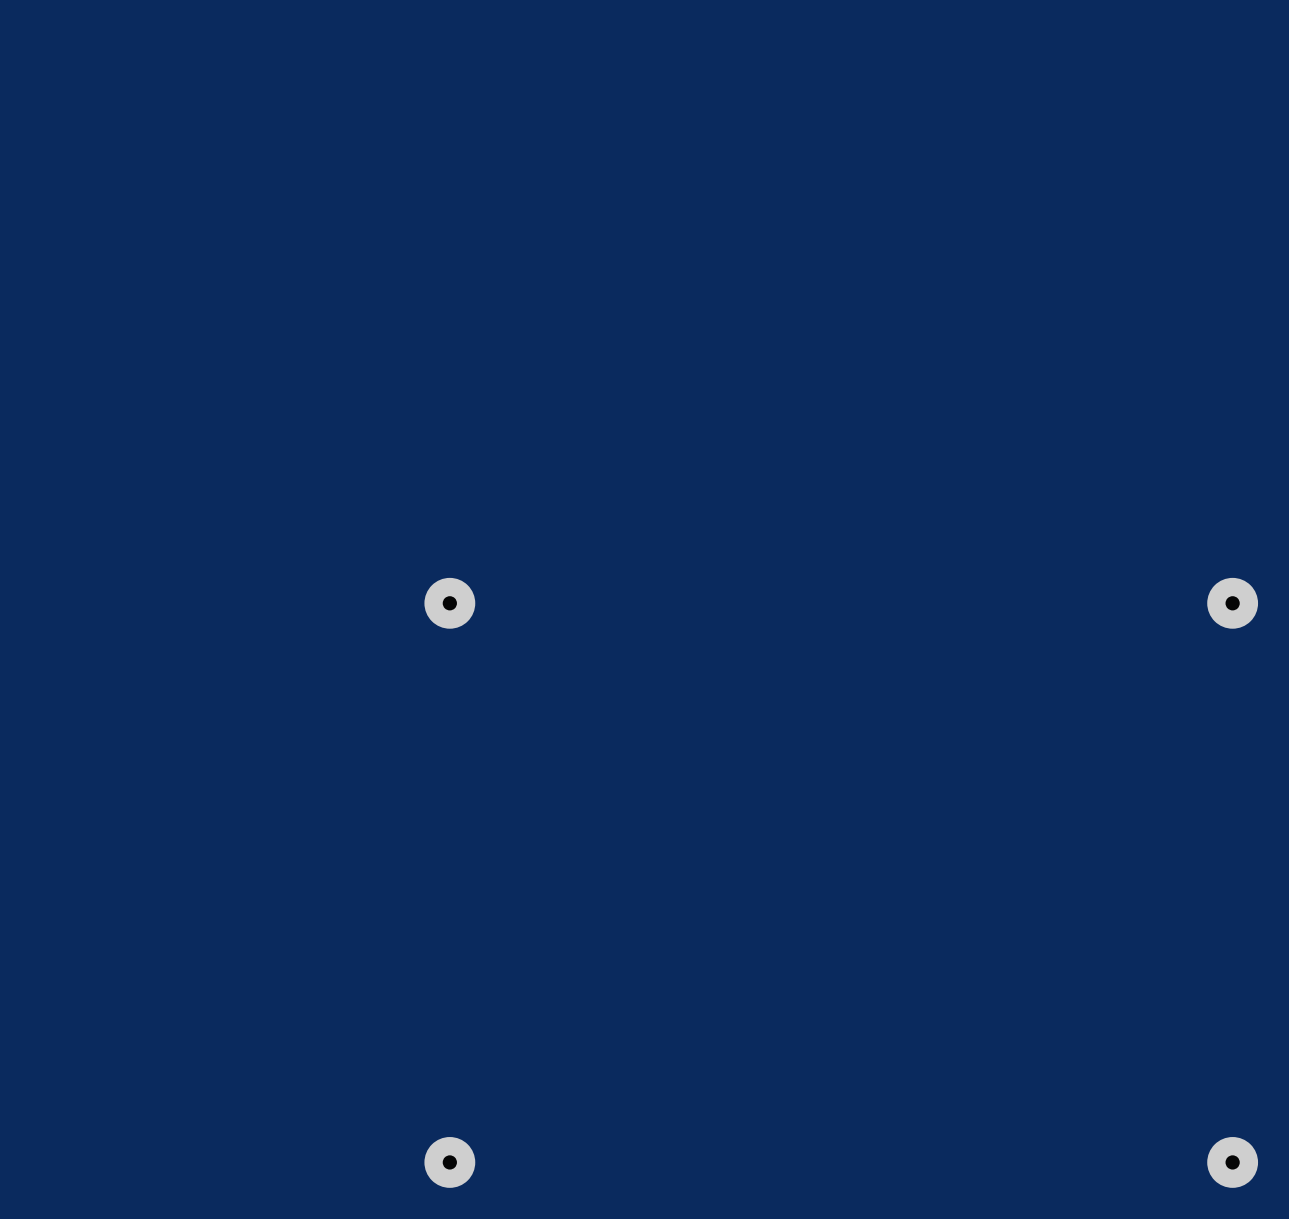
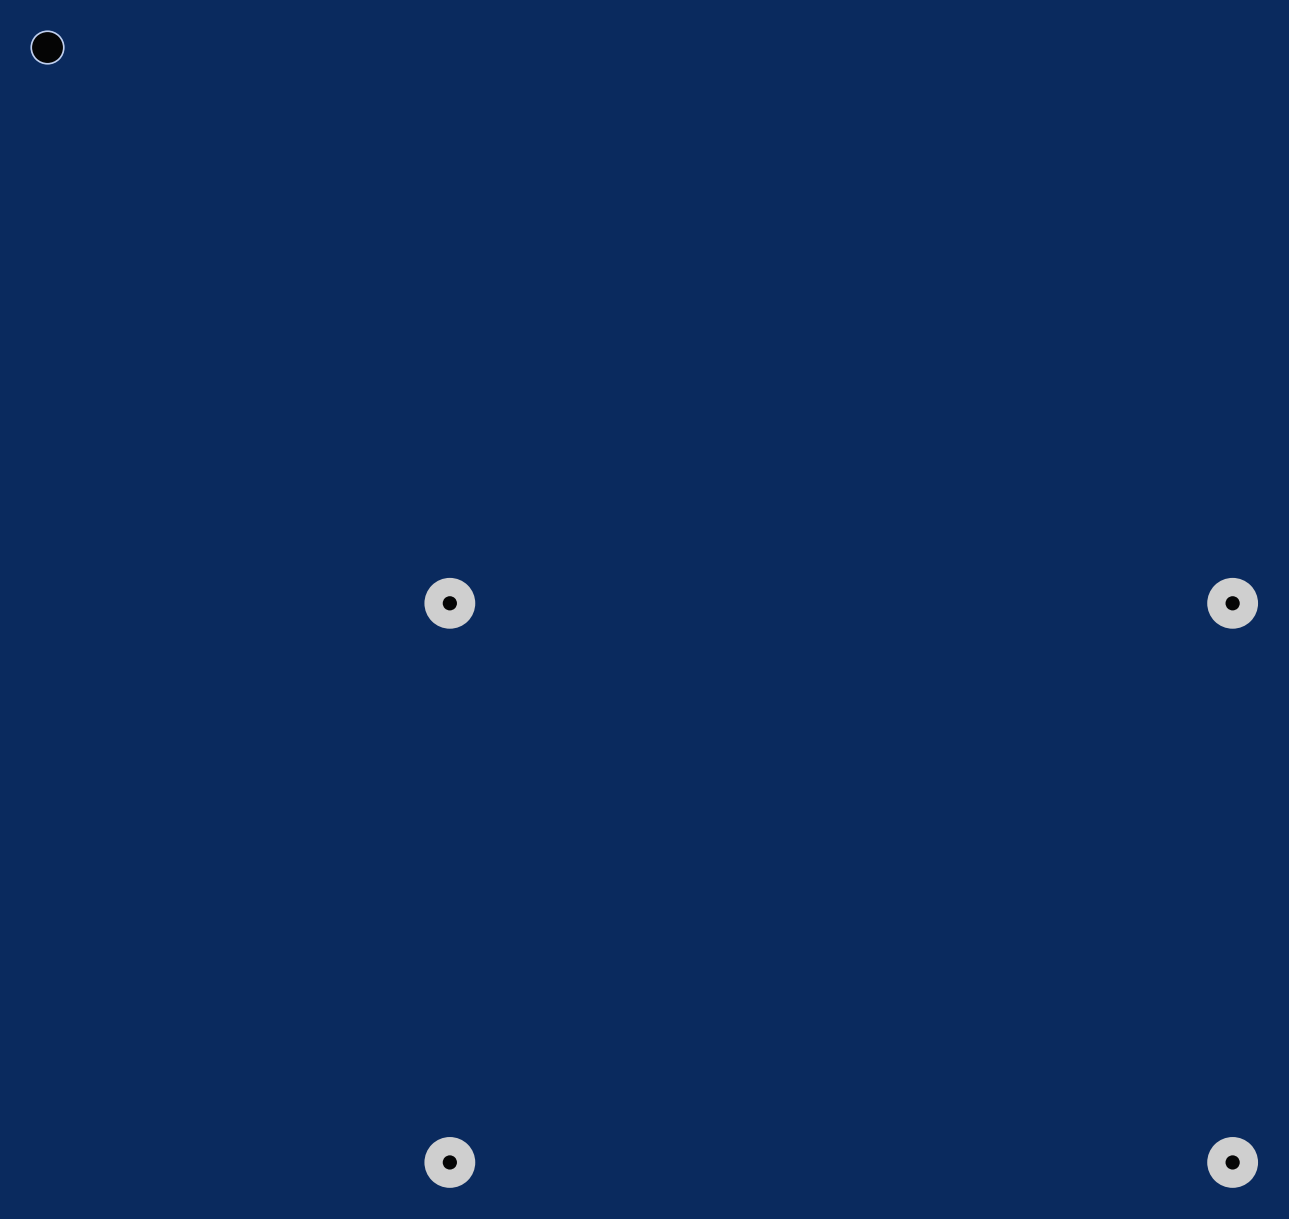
part: none -> (47, 47)

